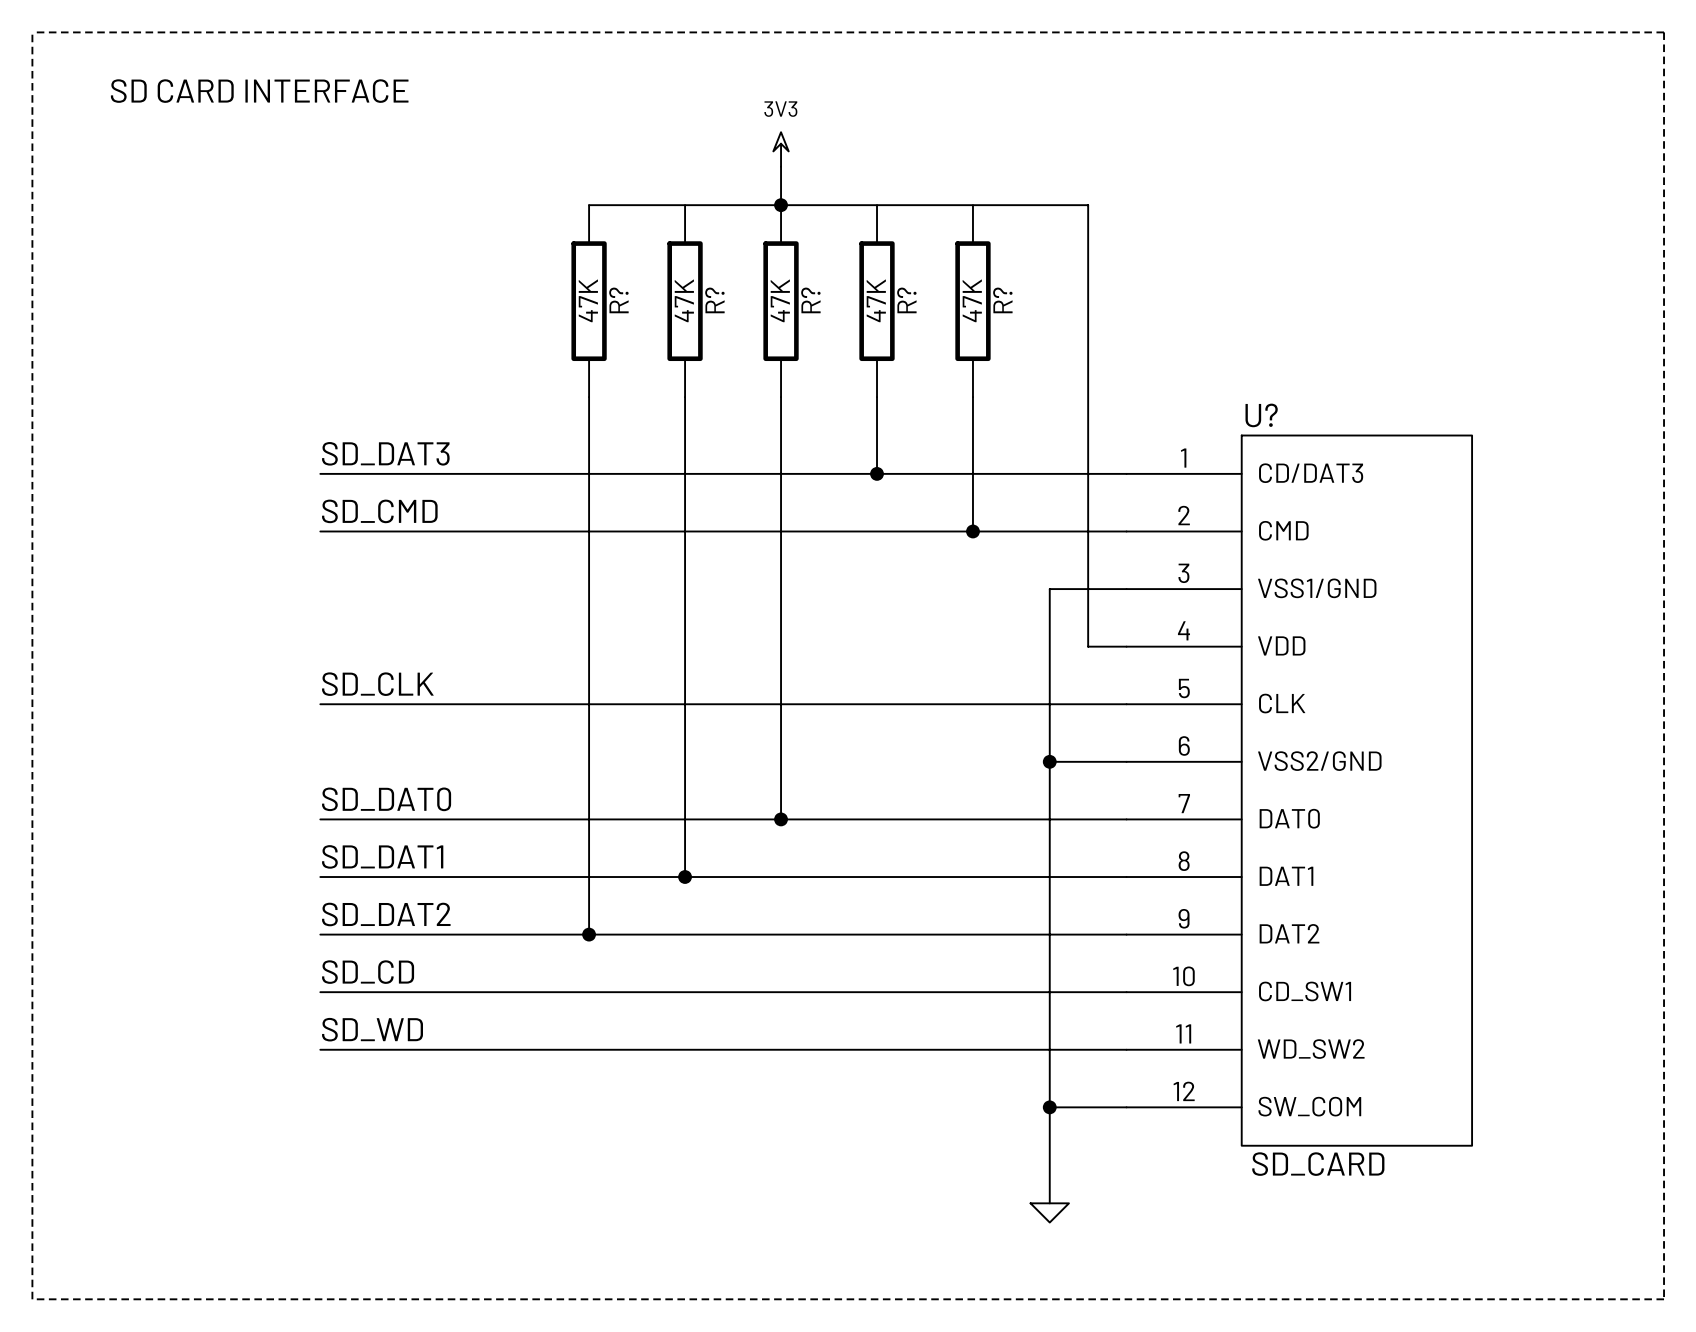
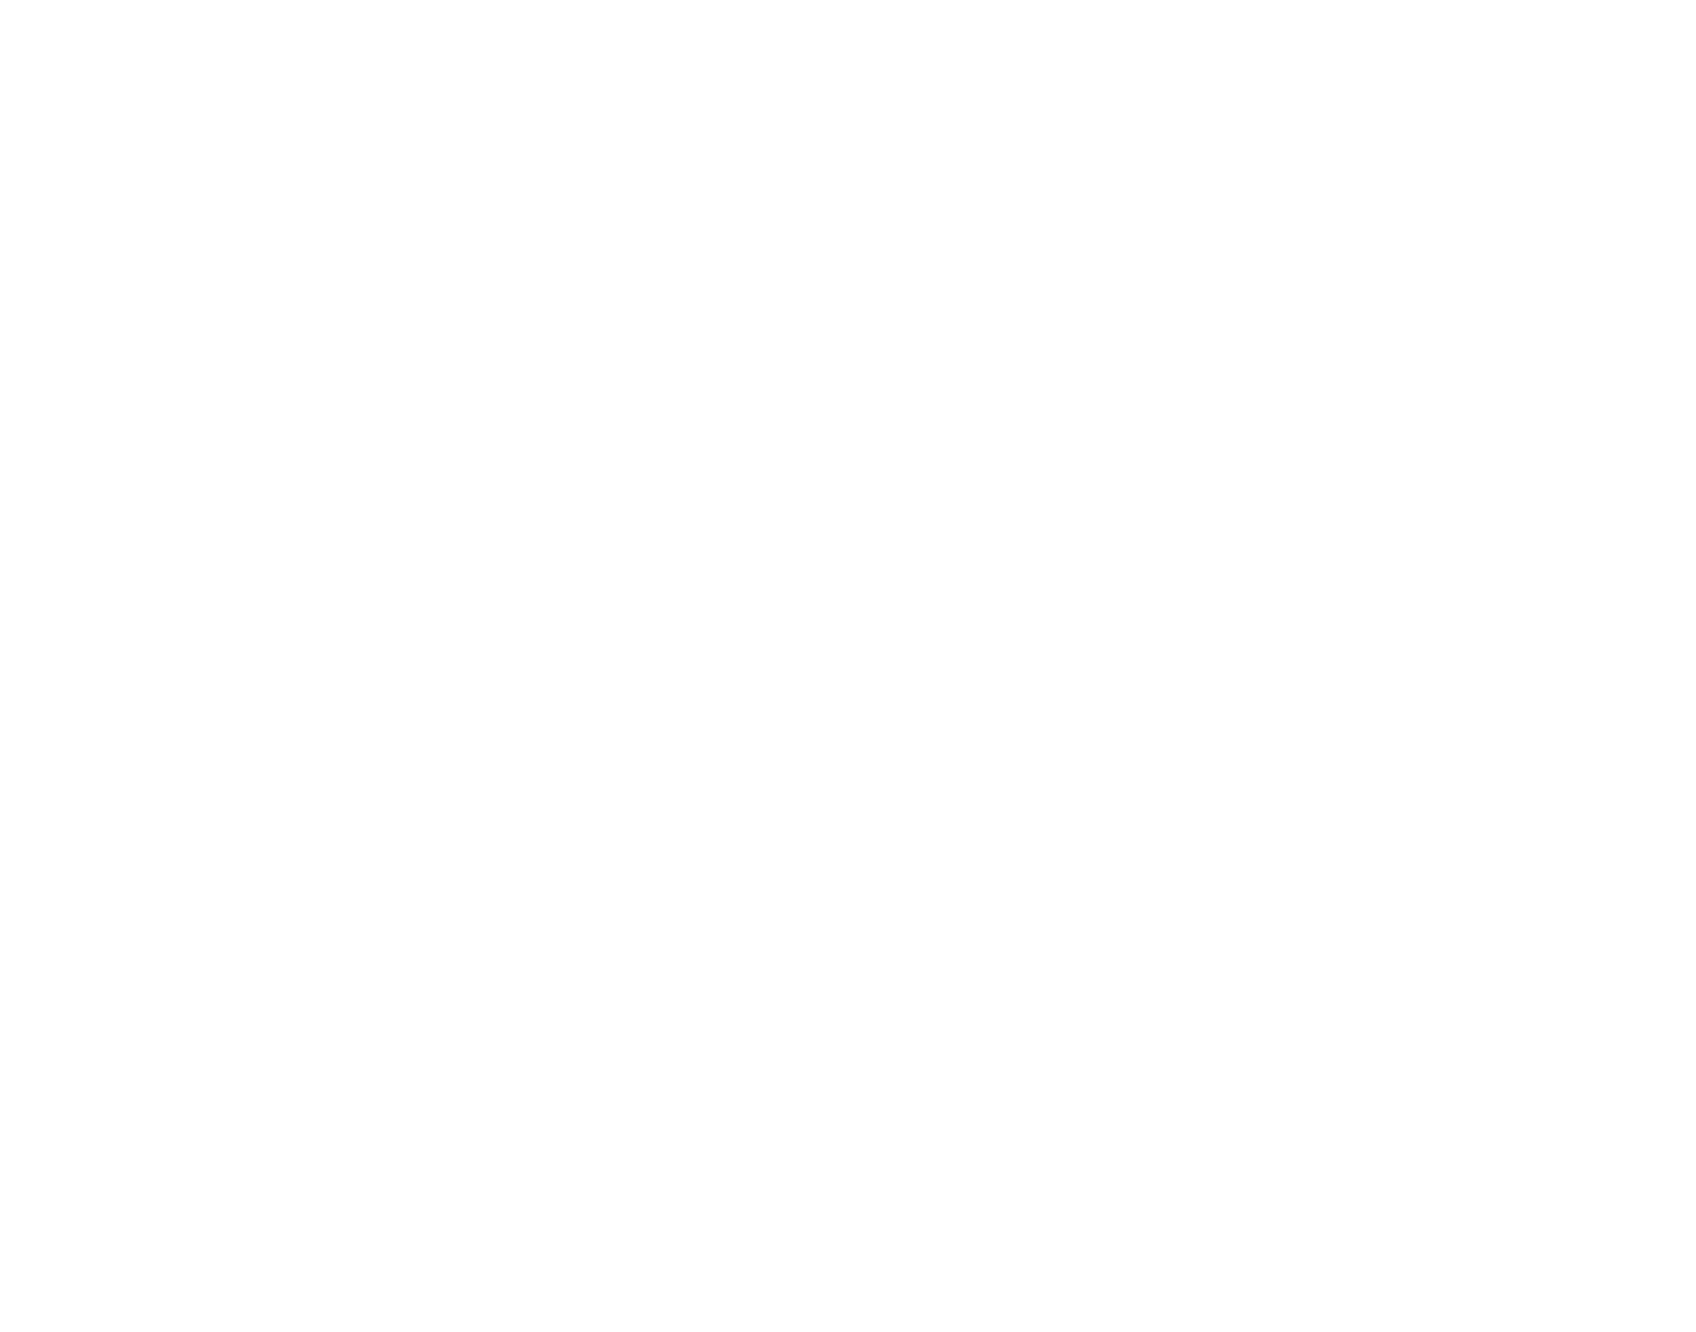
line: (32, 32) (1664, 32) (1664, 1299) (32, 1299) (32, 32) -> none
text: SD CARD INTERFACE (259, 91) -> none
power symbol: 3V3 (781, 149) -> none
wire: (781, 166) (781, 205) -> none
wire: (589, 205) (1088, 205) (1088, 646) (1126, 646) -> none
junction: (781, 205) -> none
R?: 47K (589, 301) -> none
R?: 47K (685, 301) -> none
R?: 47K (781, 301) -> none
R?: 47K (877, 301) -> none
R?: 47K (972, 301) -> none
wire: (589, 397) (589, 934) -> none
wire: (685, 397) (685, 877) -> none
wire: (781, 397) (781, 819) -> none
wire: (877, 397) (877, 473) -> none
wire: (972, 397) (972, 531) -> none
label: SD_DAT3 (385, 453) -> none
wire: (320, 473) (1126, 473) -> none
junction: (877, 473) -> none
label: SD_CMD (379, 511) -> none
wire: (320, 531) (1126, 531) -> none
junction: (972, 531) -> none
wire: (1126, 589) (1049, 589) (1049, 1203) -> none
label: SD_CLK (377, 684) -> none
wire: (320, 704) (1126, 704) -> none
wire: (1049, 761) (1126, 761) -> none
junction: (1049, 761) -> none
U?: SD_CARD (1299, 790) -> none
label: SD_DAT0 (386, 799) -> none
wire: (320, 819) (1126, 819) -> none
junction: (781, 819) -> none
label: SD_DAT1 (382, 856) -> none
wire: (320, 877) (1126, 877) -> none
junction: (685, 877) -> none
label: SD_DAT2 (386, 914) -> none
wire: (320, 934) (1126, 934) -> none
junction: (589, 934) -> none
label: SD_CD (368, 972) -> none
wire: (320, 992) (1126, 992) -> none
label: SD_WD (372, 1029) -> none
wire: (320, 1049) (1126, 1049) -> none
wire: (1049, 1107) (1126, 1107) -> none
junction: (1049, 1107) -> none
power symbol: (1049, 1212) -> none

